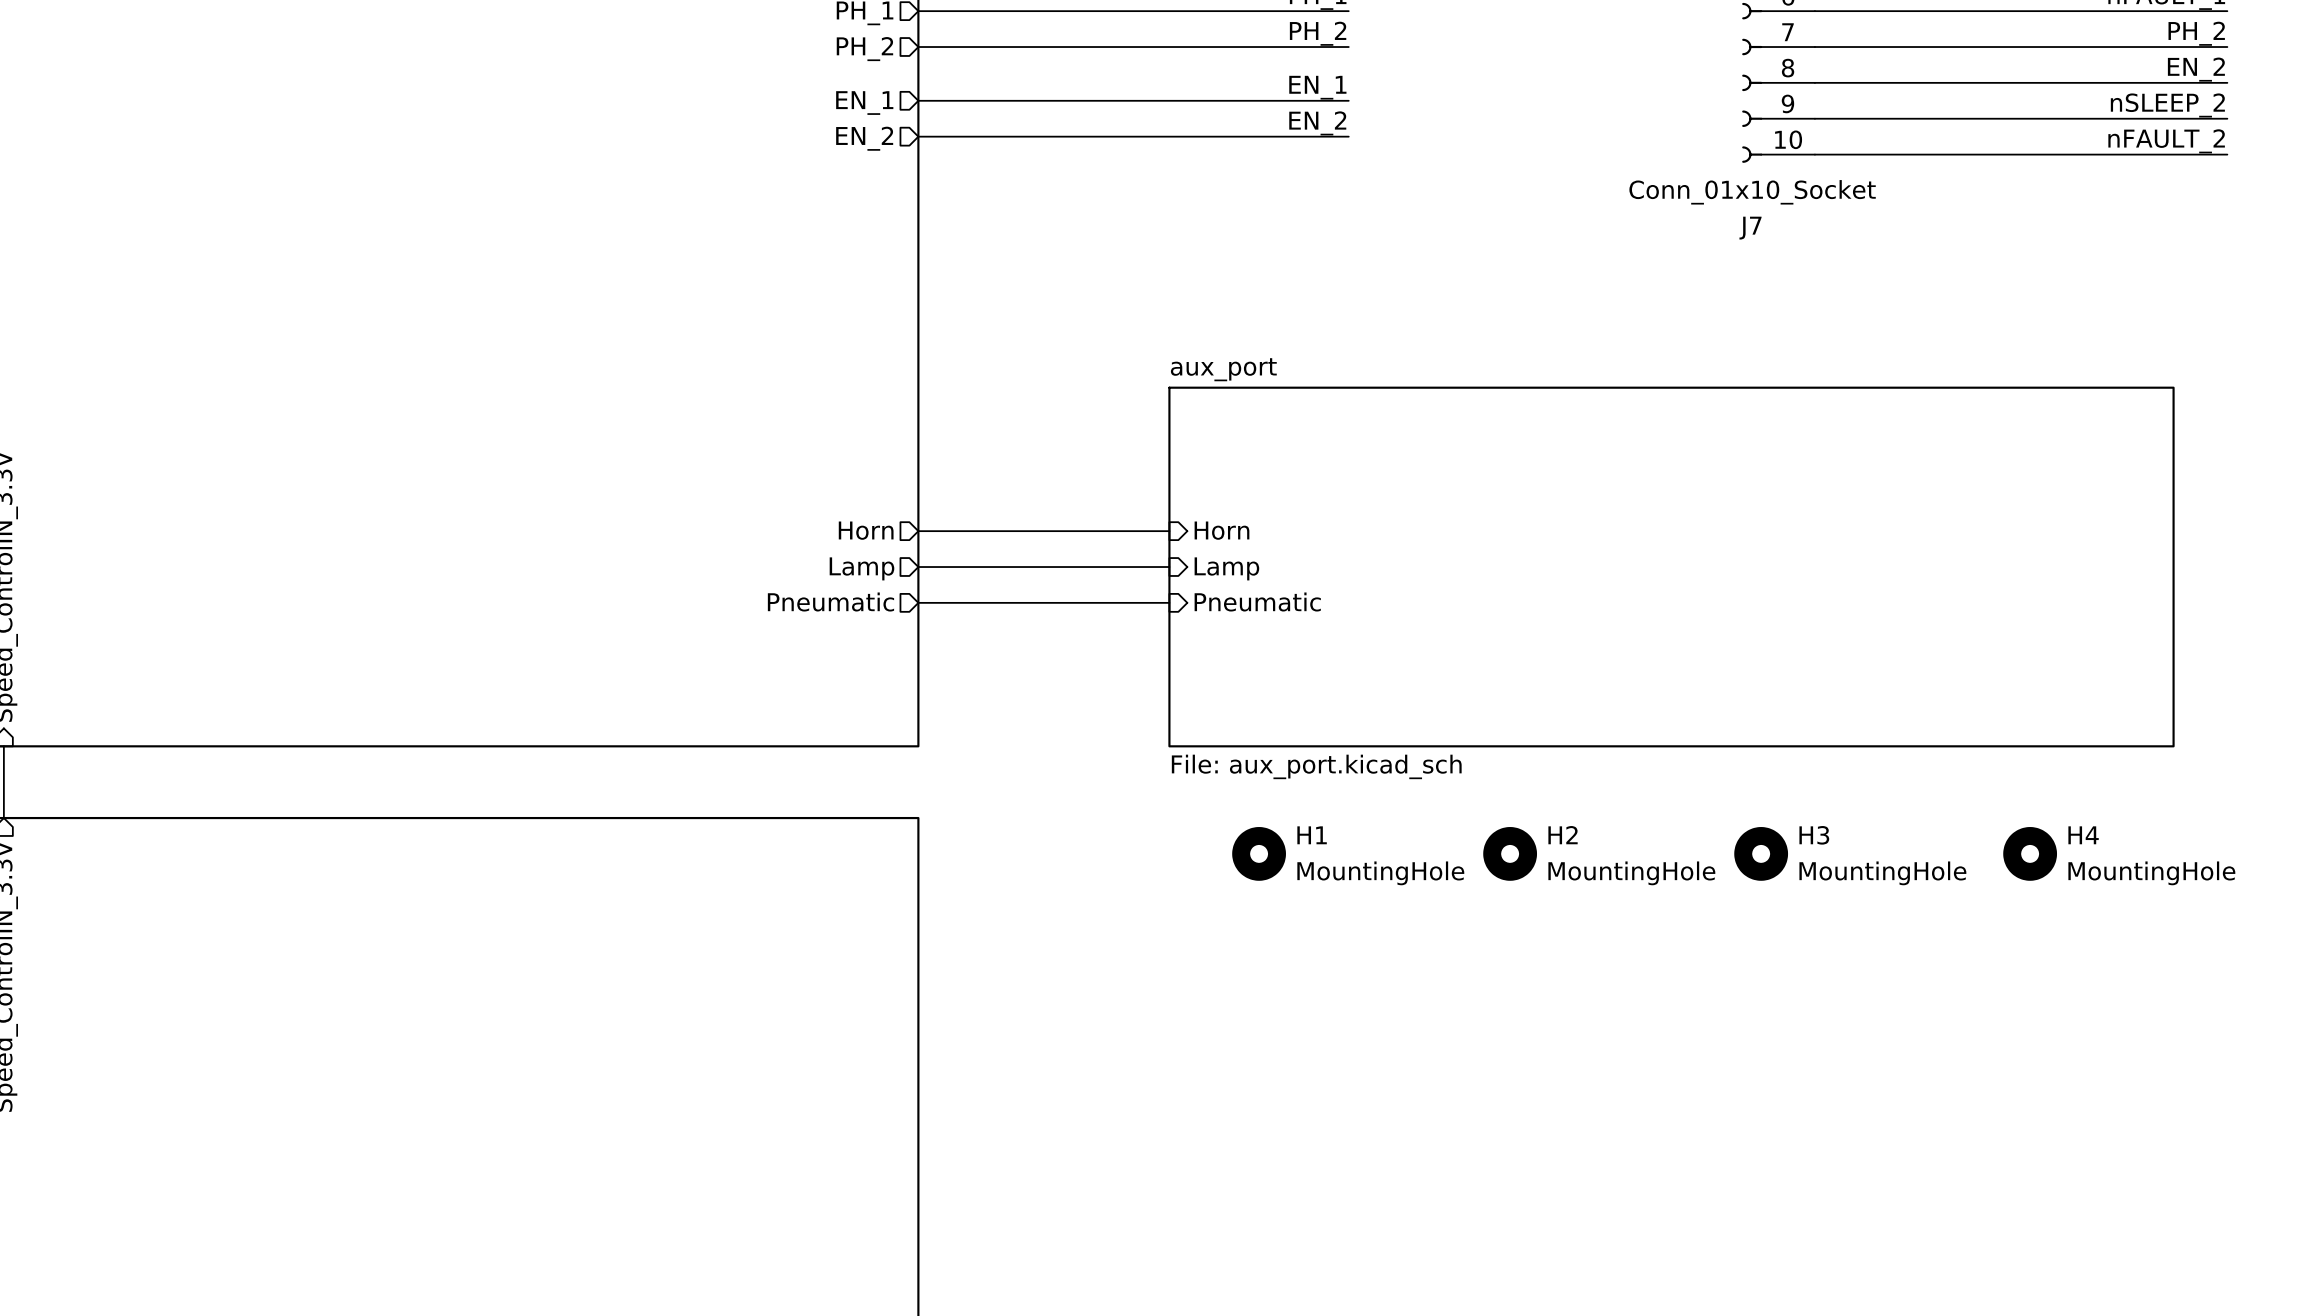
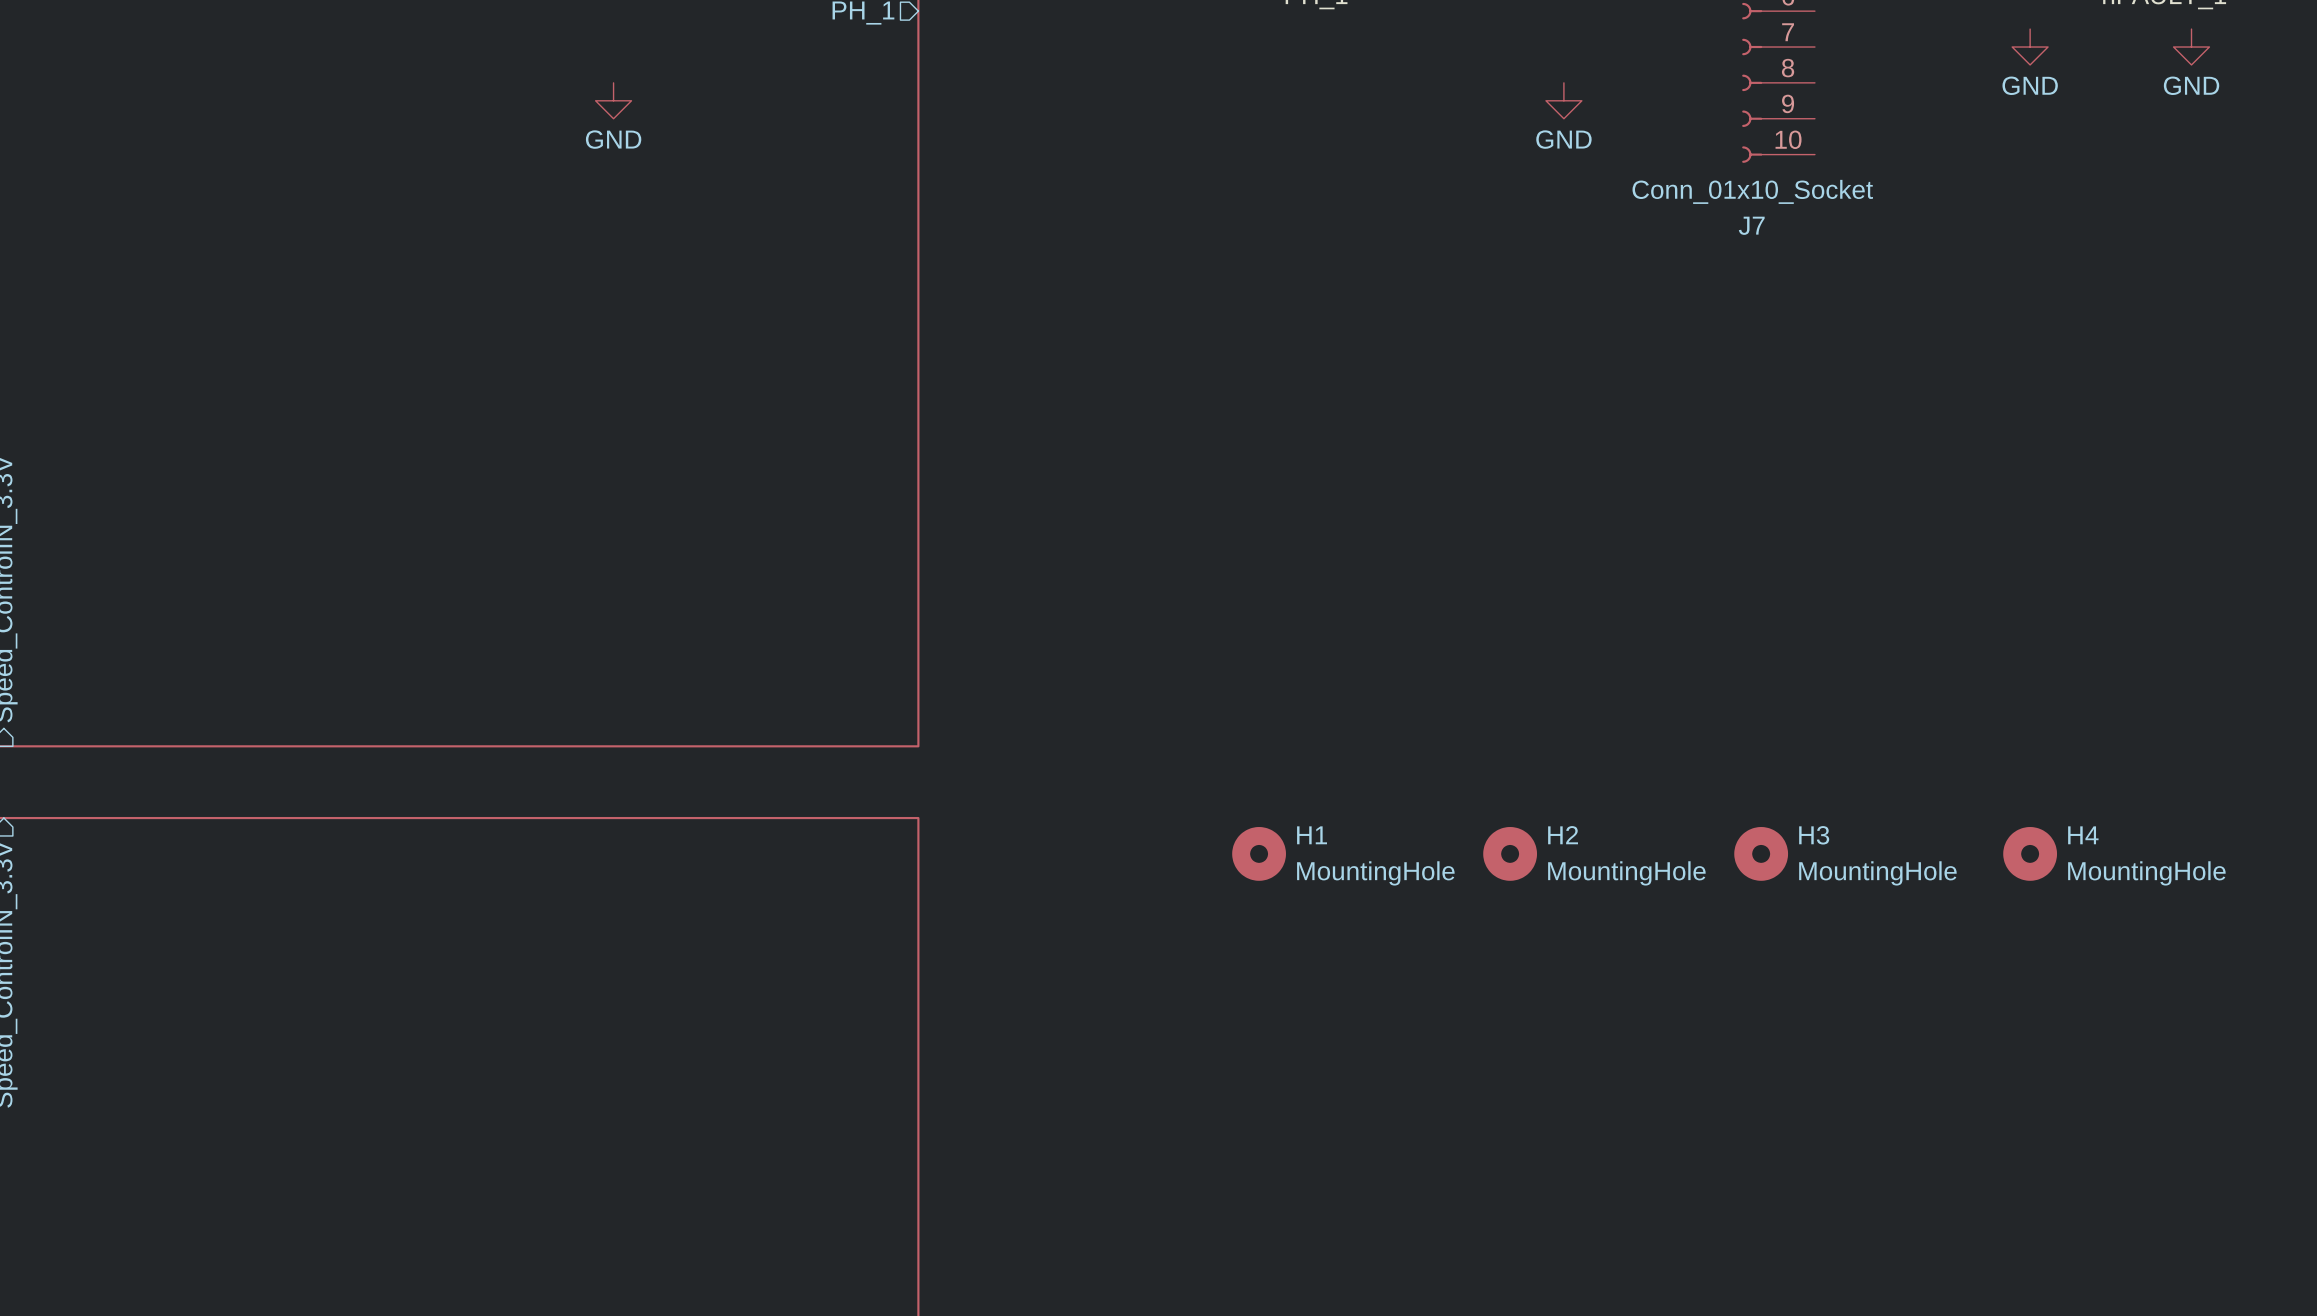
wire: (918, 11) (1348, 11) -> none
wire: (1814, 11) (2227, 11) -> none
label: PH_2 (1318, 33) -> none
label: PH_2 (2196, 33) -> none
wire: (918, 47) (1348, 47) -> none
wire: (1814, 47) (2227, 47) -> none
power symbol: none -> GND (2030, 47)
power symbol: none -> GND (2191, 47)
sheet pin: PH_2 (864, 49) -> none
label: EN_2 (2196, 69) -> none
wire: (1814, 82) (2227, 82) -> none
label: EN_1 (1317, 87) -> none
power symbol: none -> GND (613, 100)
wire: (918, 100) (1348, 100) -> none
power symbol: none -> GND (1563, 100)
sheet pin: EN_1 (864, 103) -> none
label: nSLEEP_2 (2167, 105) -> none
wire: (1814, 118) (2227, 118) -> none
label: EN_2 (1317, 123) -> none
wire: (918, 136) (1348, 136) -> none
sheet pin: EN_2 (864, 138) -> none
label: nFAULT_2 (2166, 141) -> none
wire: (1814, 154) (2227, 154) -> none
sheet pin: Horn (866, 530) -> none
sheet pin: Horn (1221, 530) -> none
wire: (918, 531) (1169, 531) -> none
wire: (918, 567) (1169, 567) -> none
sheet aux_port: File: aux_port.kicad_sch (1671, 567) -> none
sheet pin: Lamp (861, 568) -> none
sheet pin: Lamp (1226, 568) -> none
sheet pin: Pneumatic (830, 602) -> none
wire: (918, 602) (1169, 602) -> none
sheet pin: Pneumatic (1257, 602) -> none
wire: (3, 746) (3, 818) -> none

